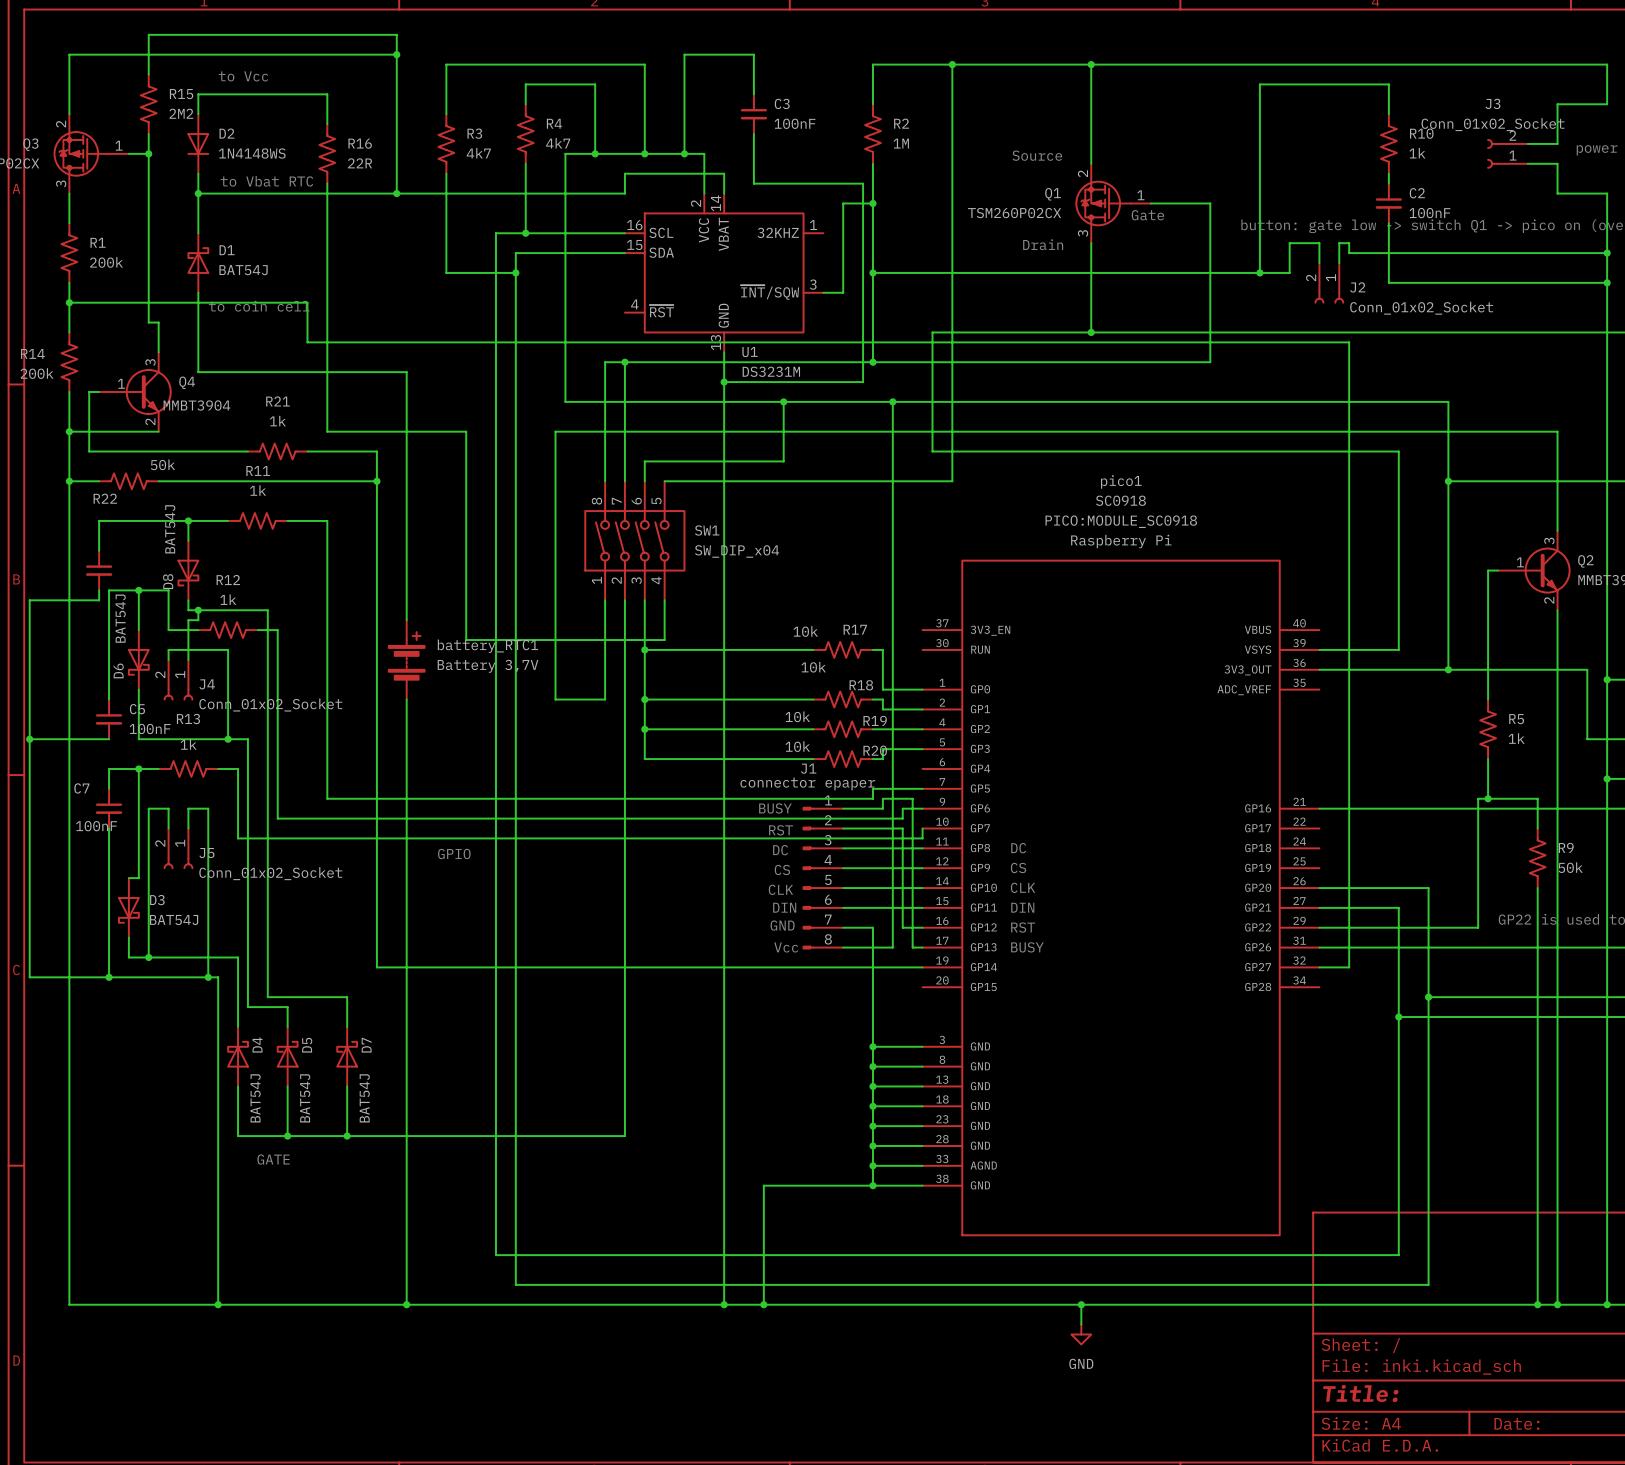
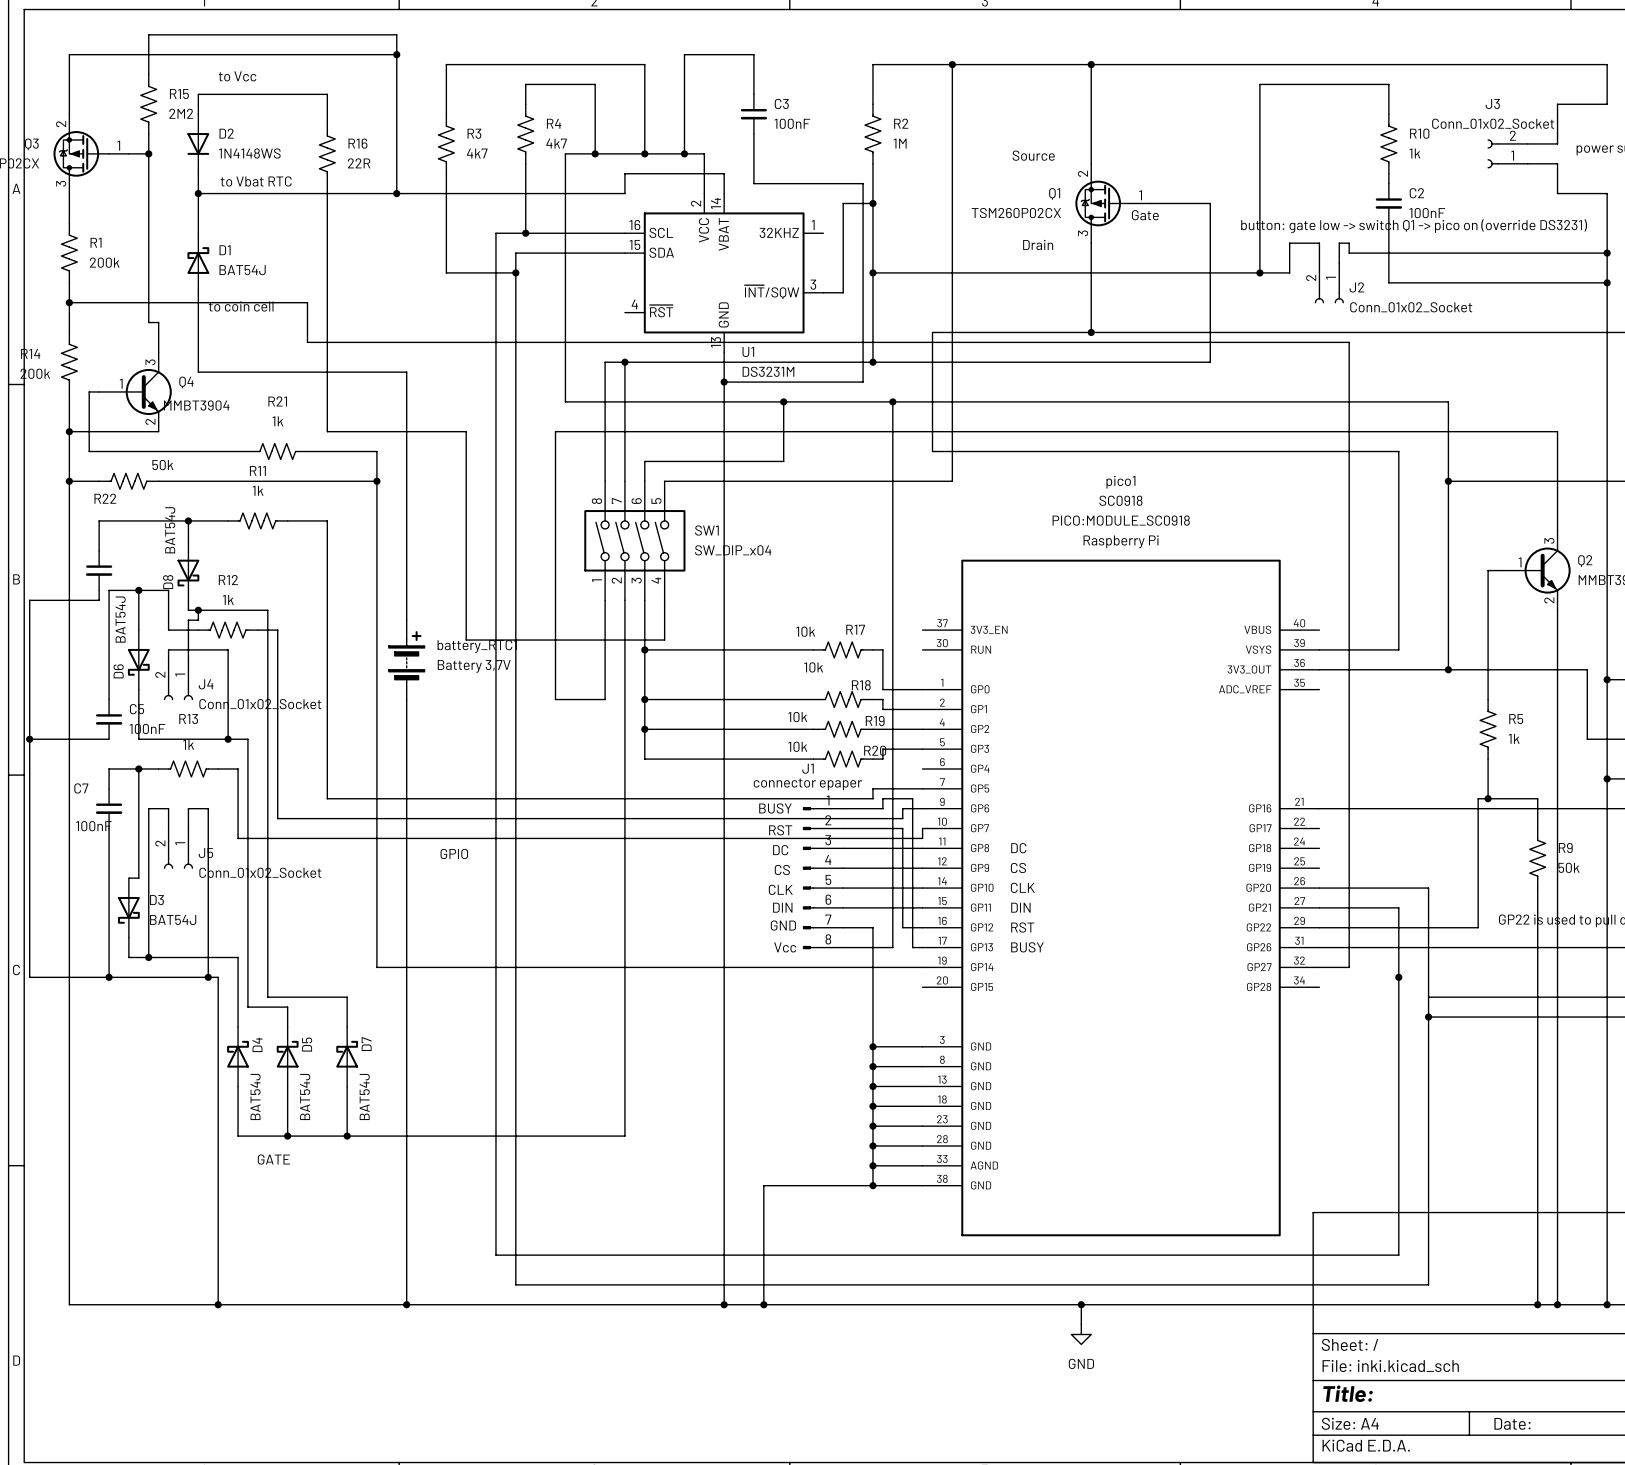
junction: none -> (1398, 977)
junction: (1428, 997) -> none
wire: (1398, 1017) (1428, 1017) -> none
junction: (1398, 1017) -> none
junction: none -> (1428, 1017)

